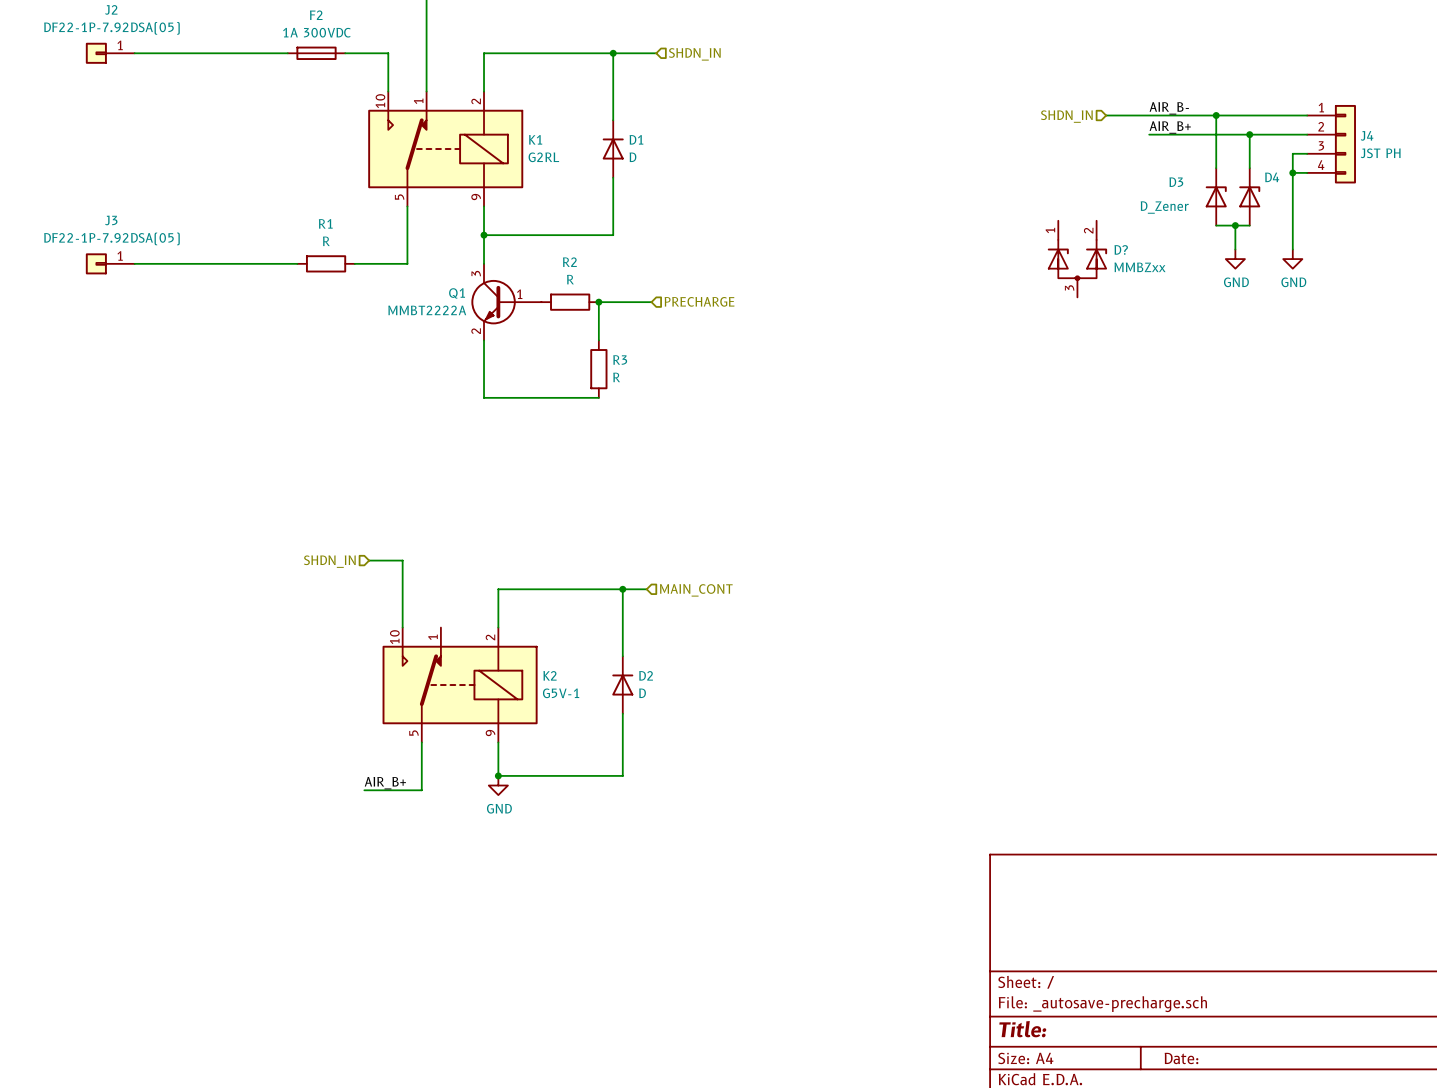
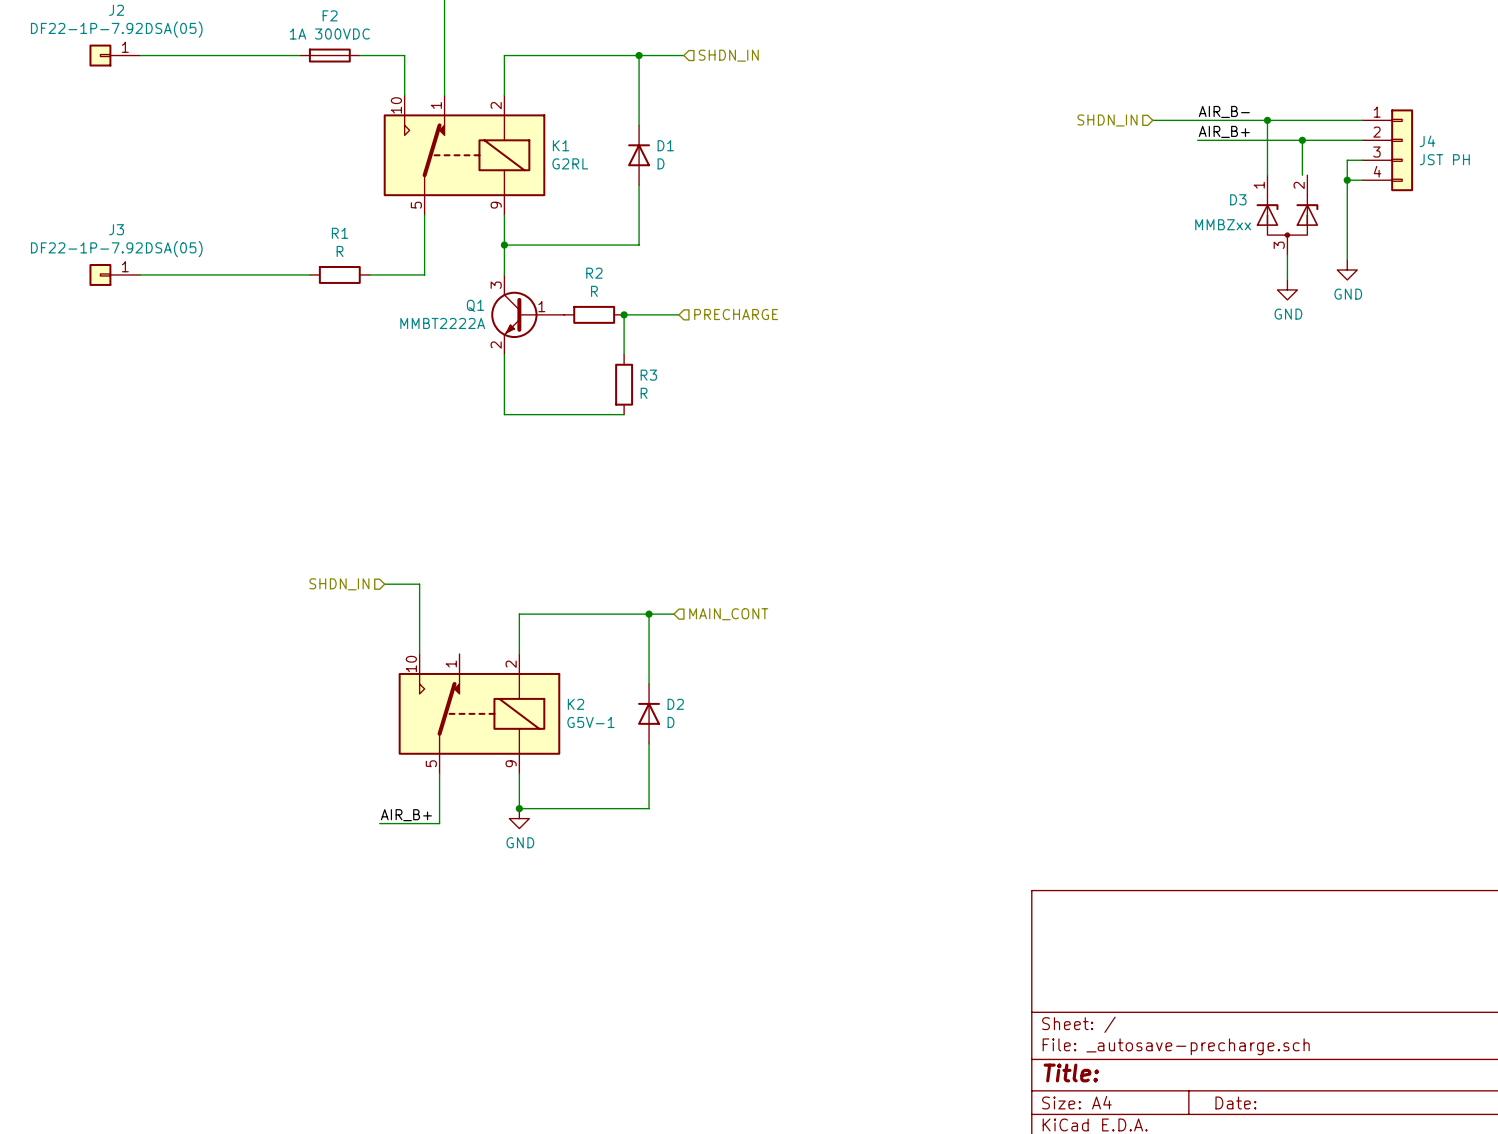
D3 symbol: [1205, 168, 1227, 226] -> [1256, 175, 1319, 256]
D4: (1249, 196) -> none
D3 value: D_Zener (1164, 207) -> MMBZxx (1223, 224)
junction: (1235, 225) -> none
D?: MMBZxx (1077, 259) -> none
power symbol position: GND (1235, 259) -> GND (1287, 289)

